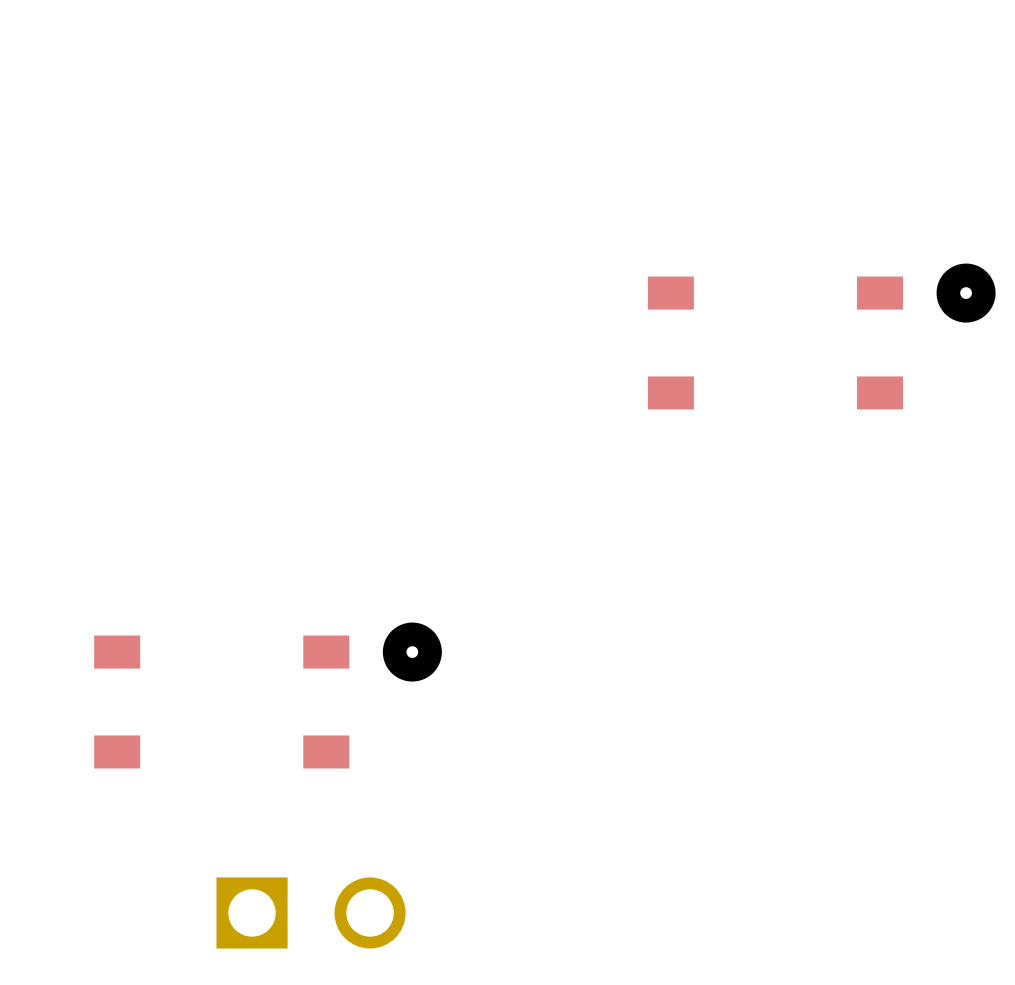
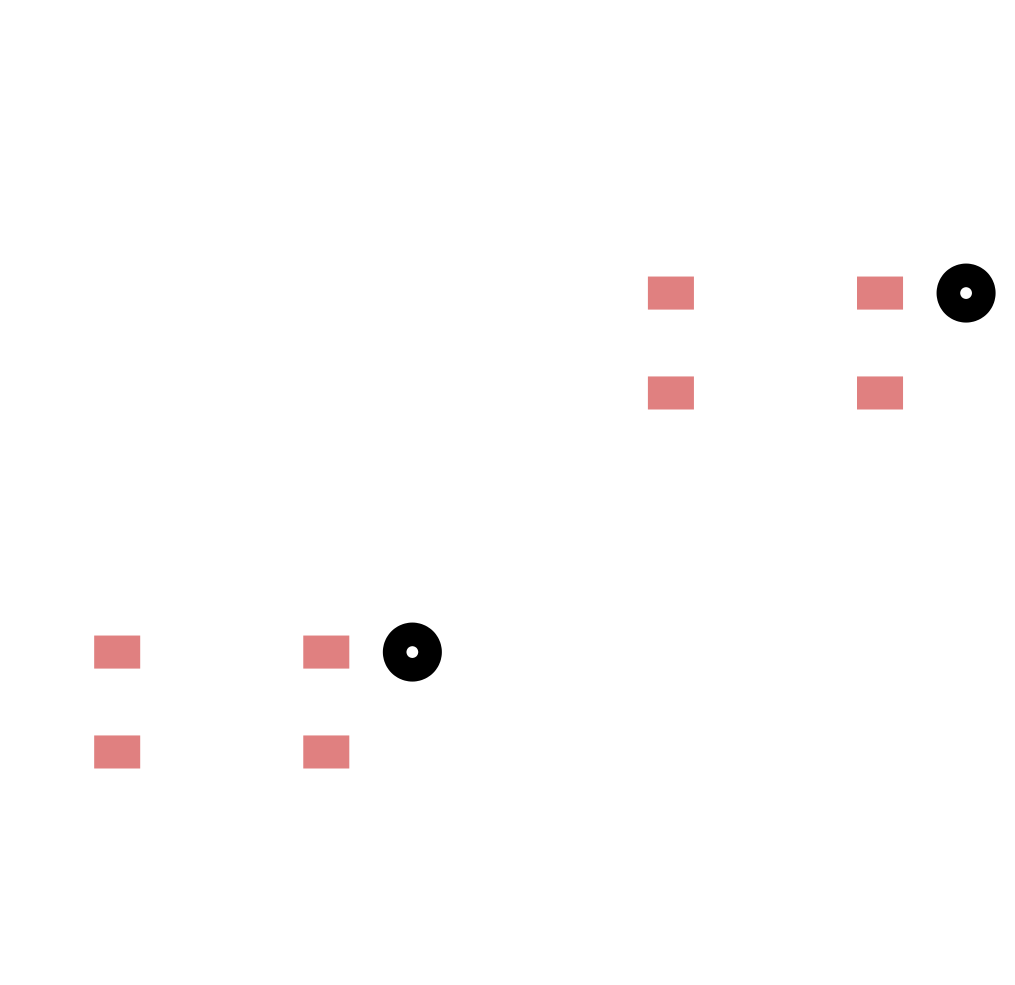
part: (311, 912) -> none

